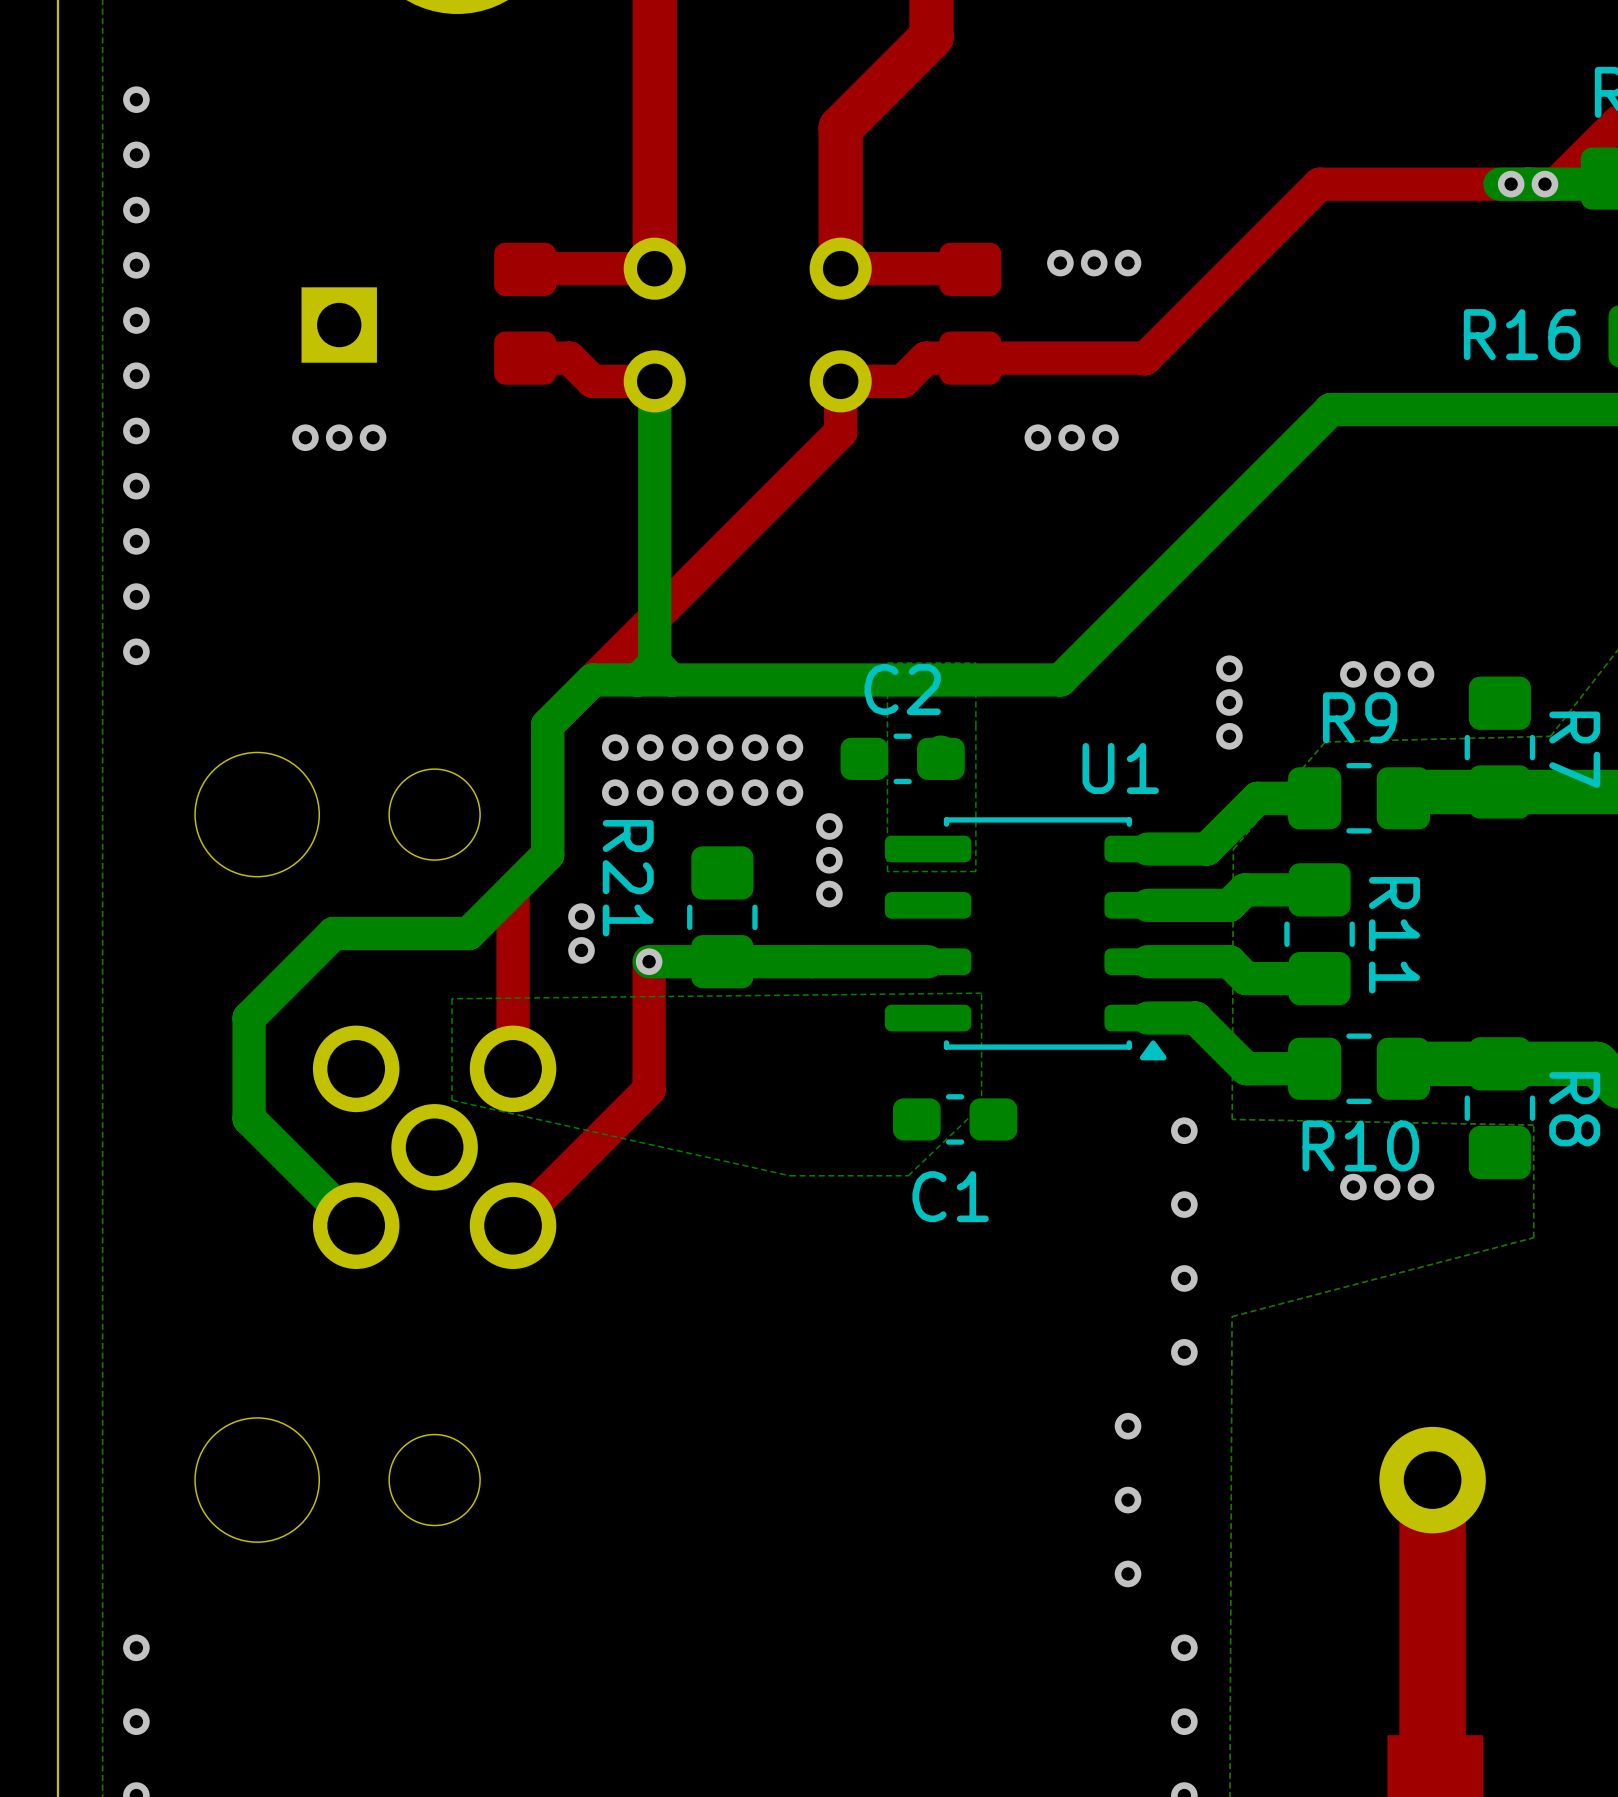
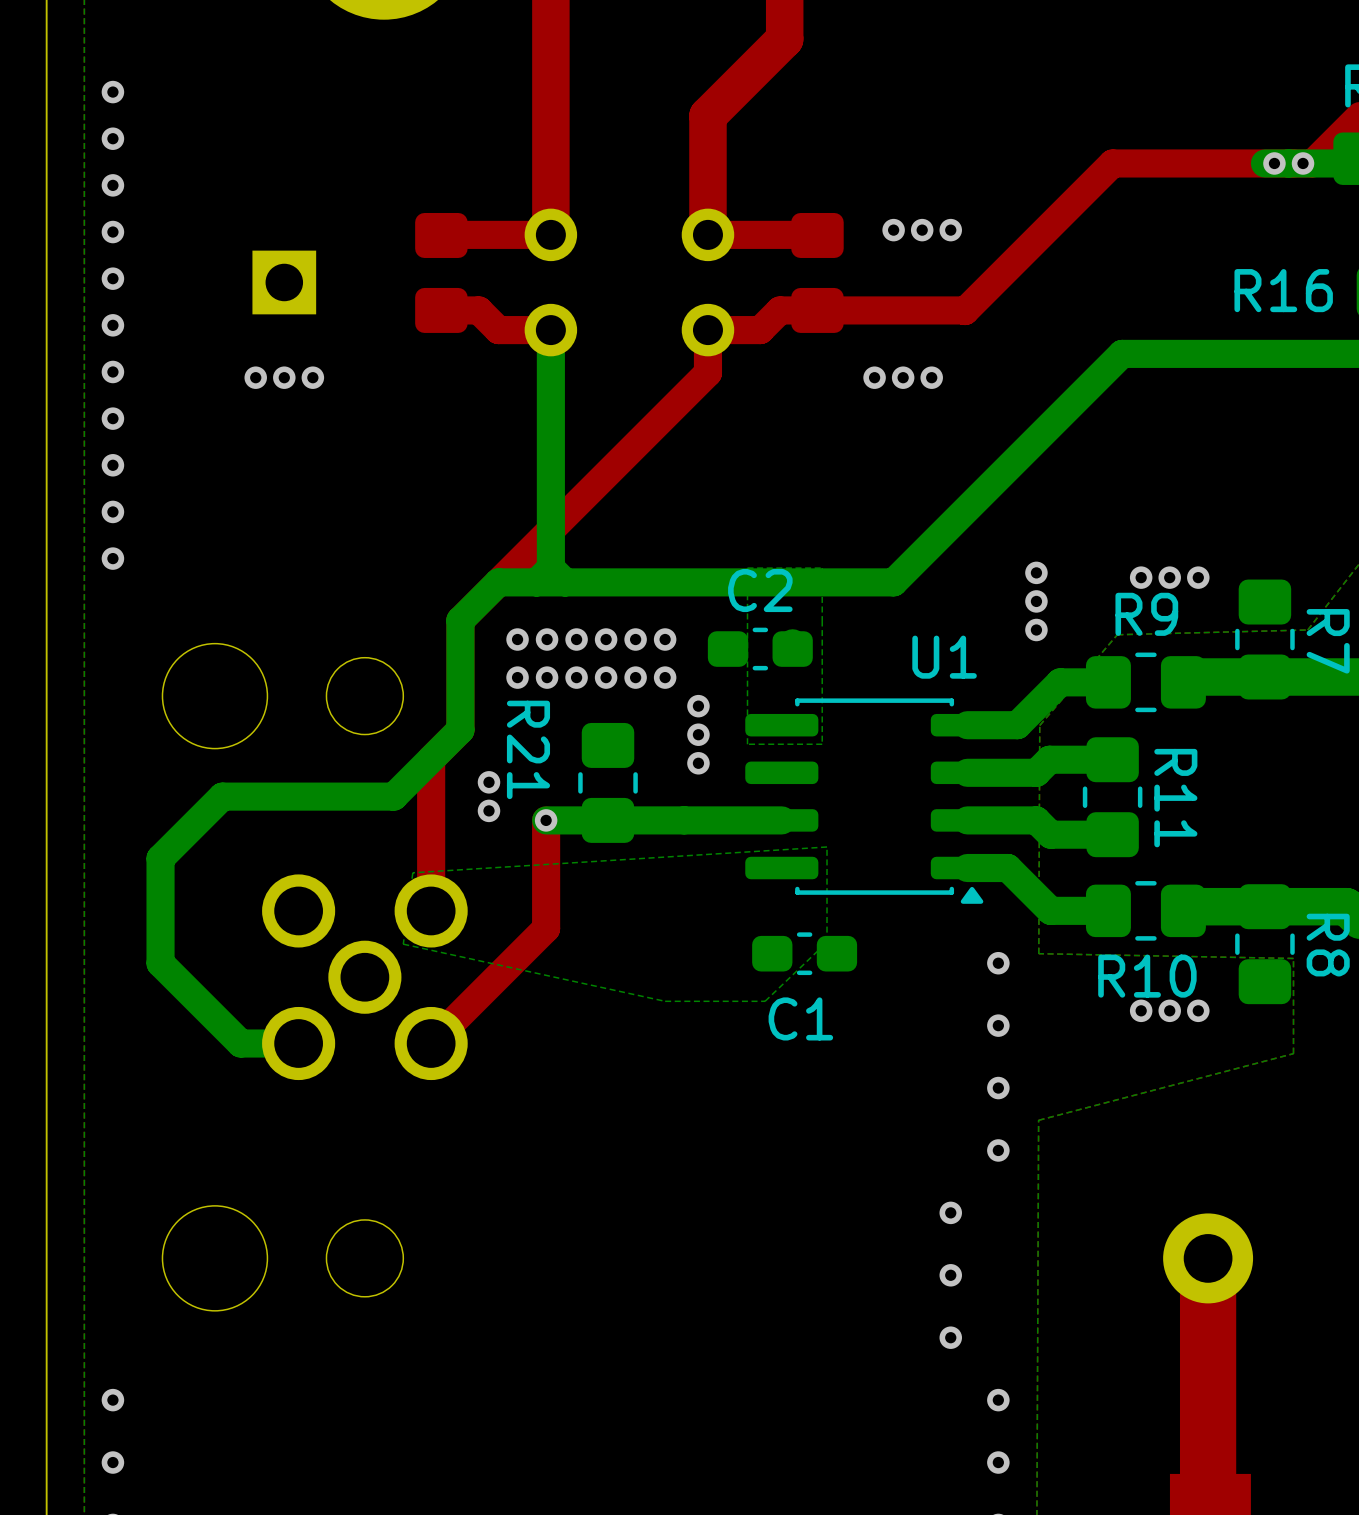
bottom track: (333, 933) (249, 1018) (249, 1118) (356, 1225) -> (279, 796) (222, 796) (160, 858) (160, 963) (240, 1043) (298, 1043)
bottom zone outline: (981, 993) (451, 998) (451, 1100) (789, 1175) -> (827, 846) (412, 872) (403, 944) (665, 1001)

